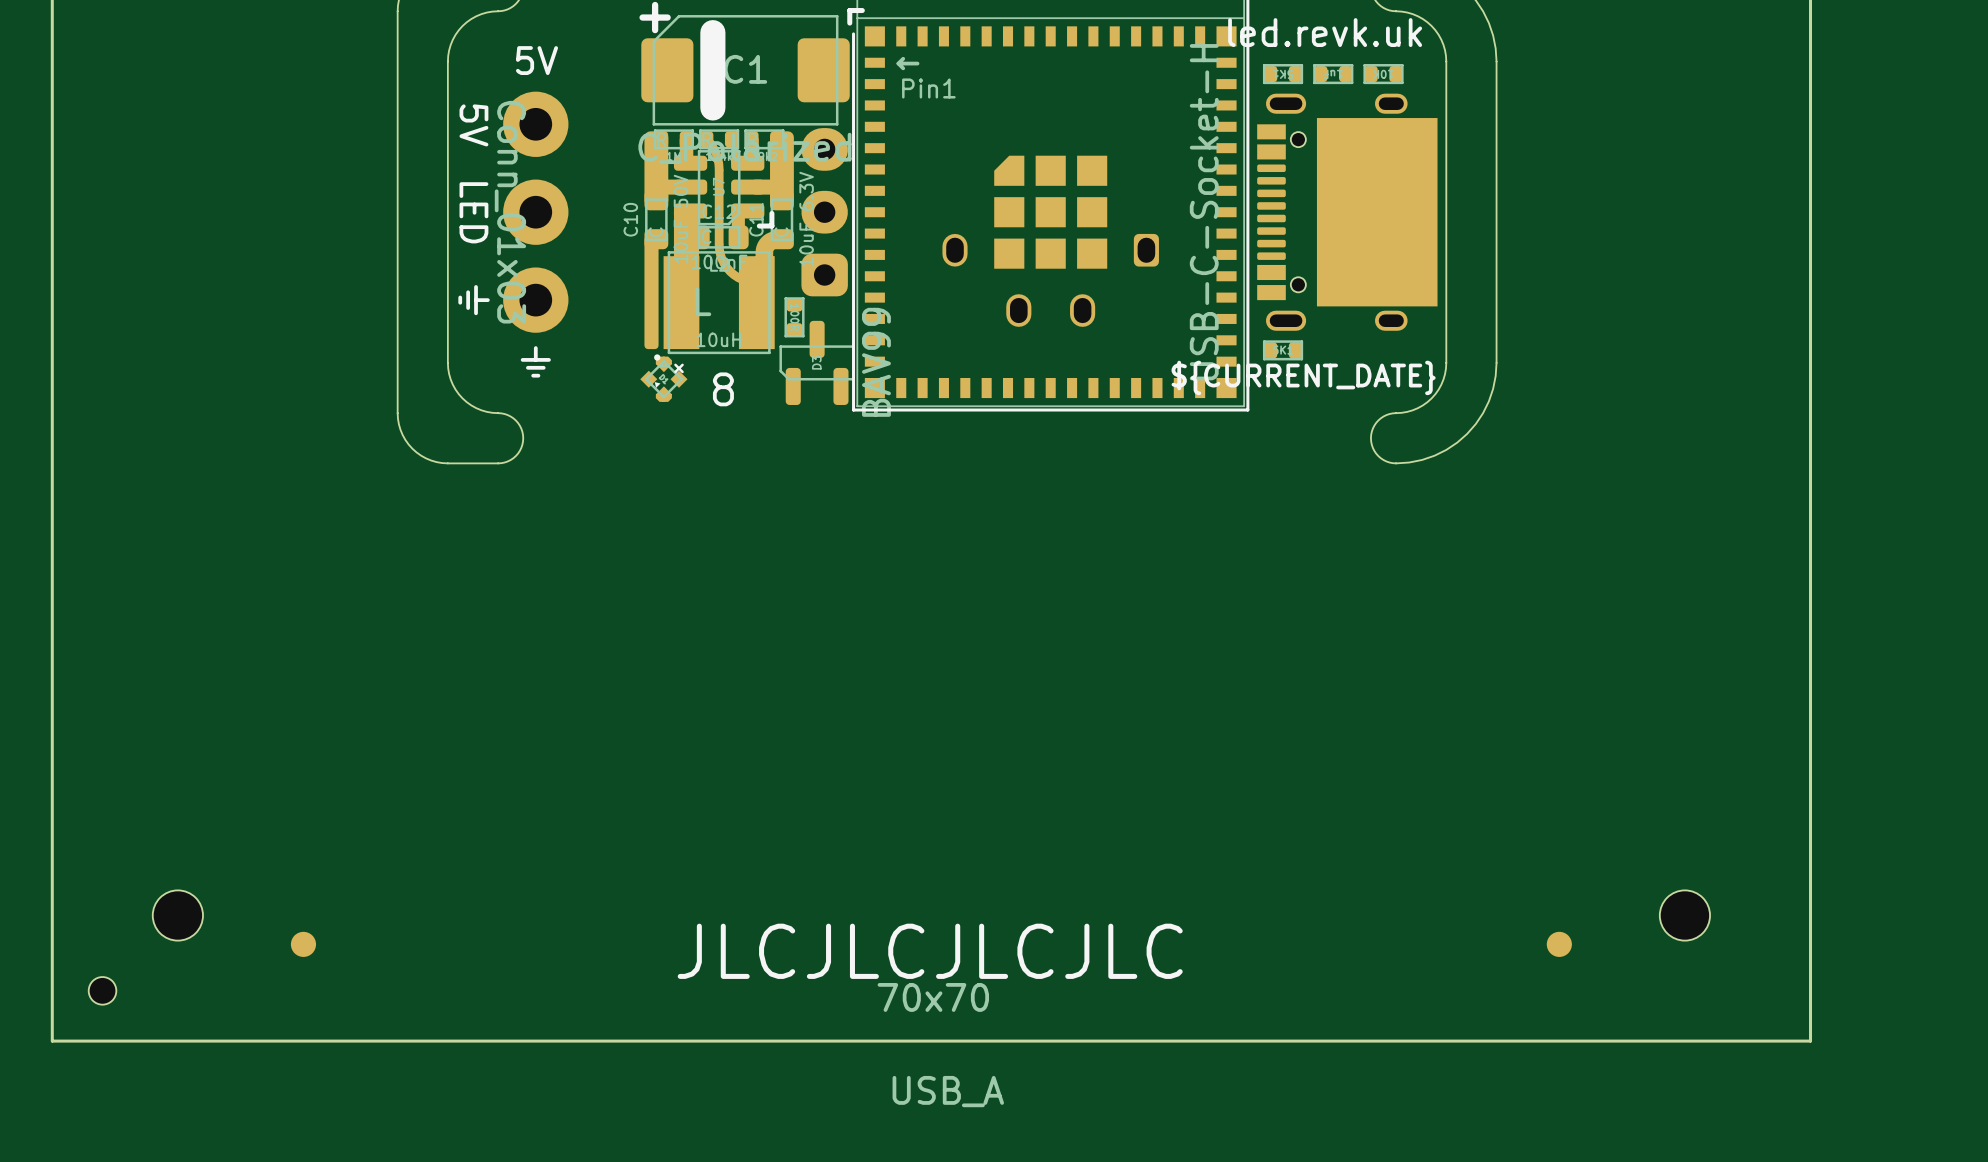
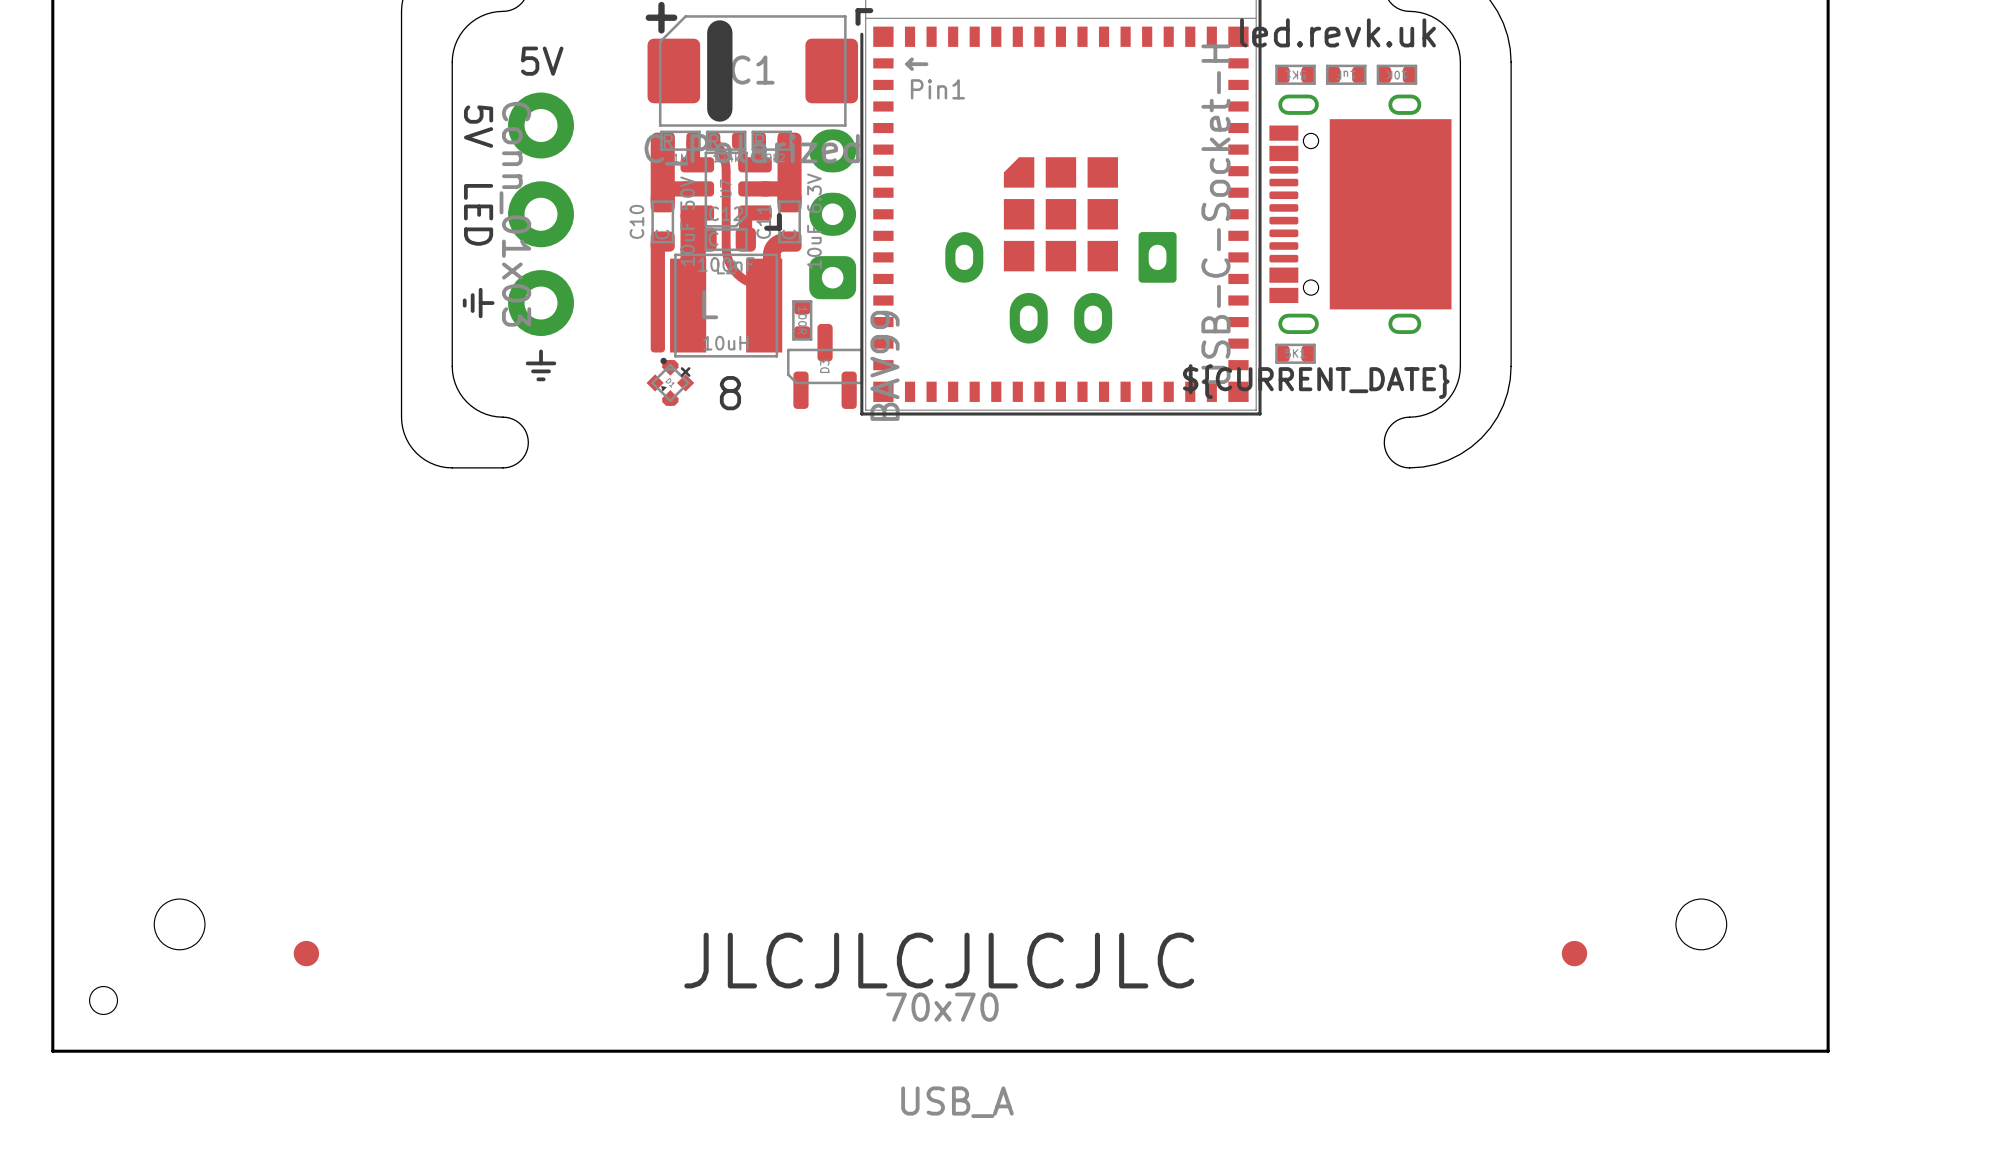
part footprint: [942, 233, 1159, 327] -> [945, 232, 1177, 344]

